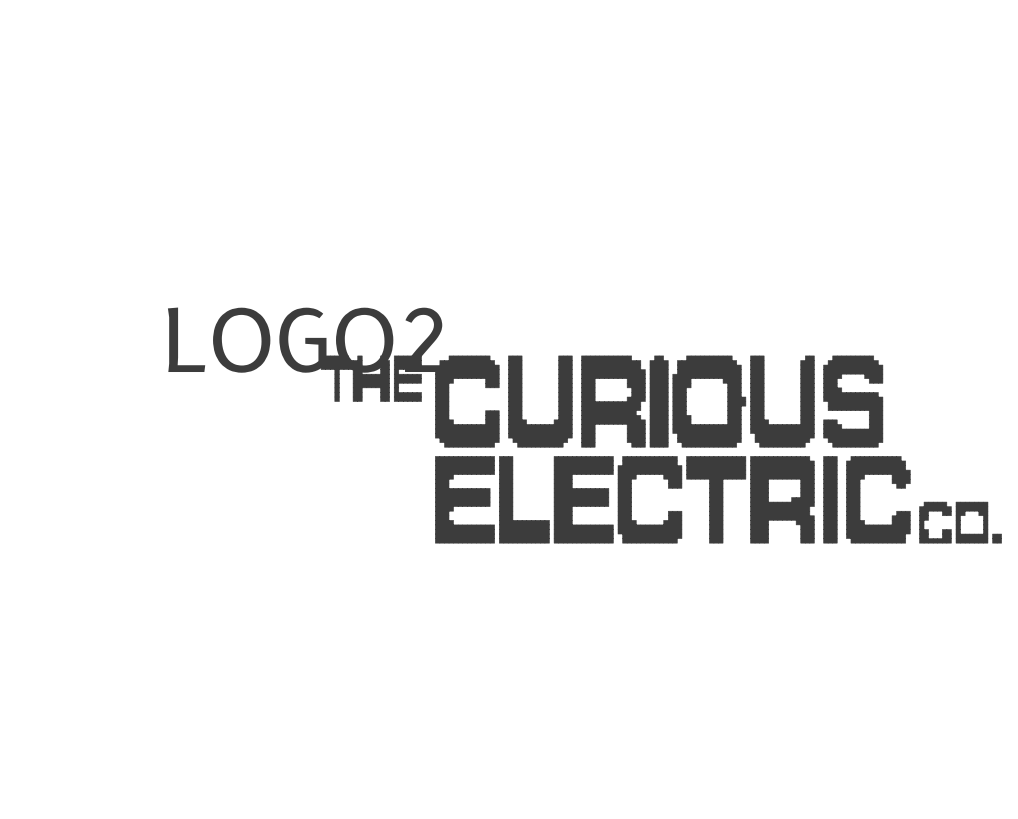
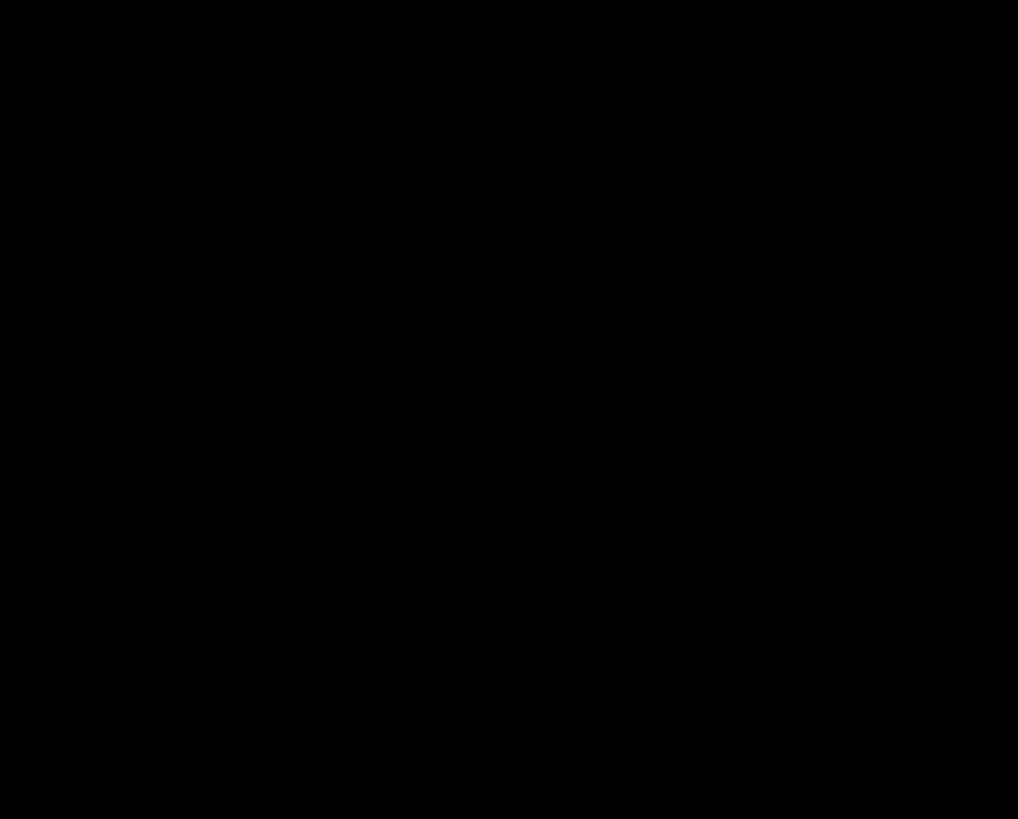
drawing: [320, 355, 1002, 544] -> none

